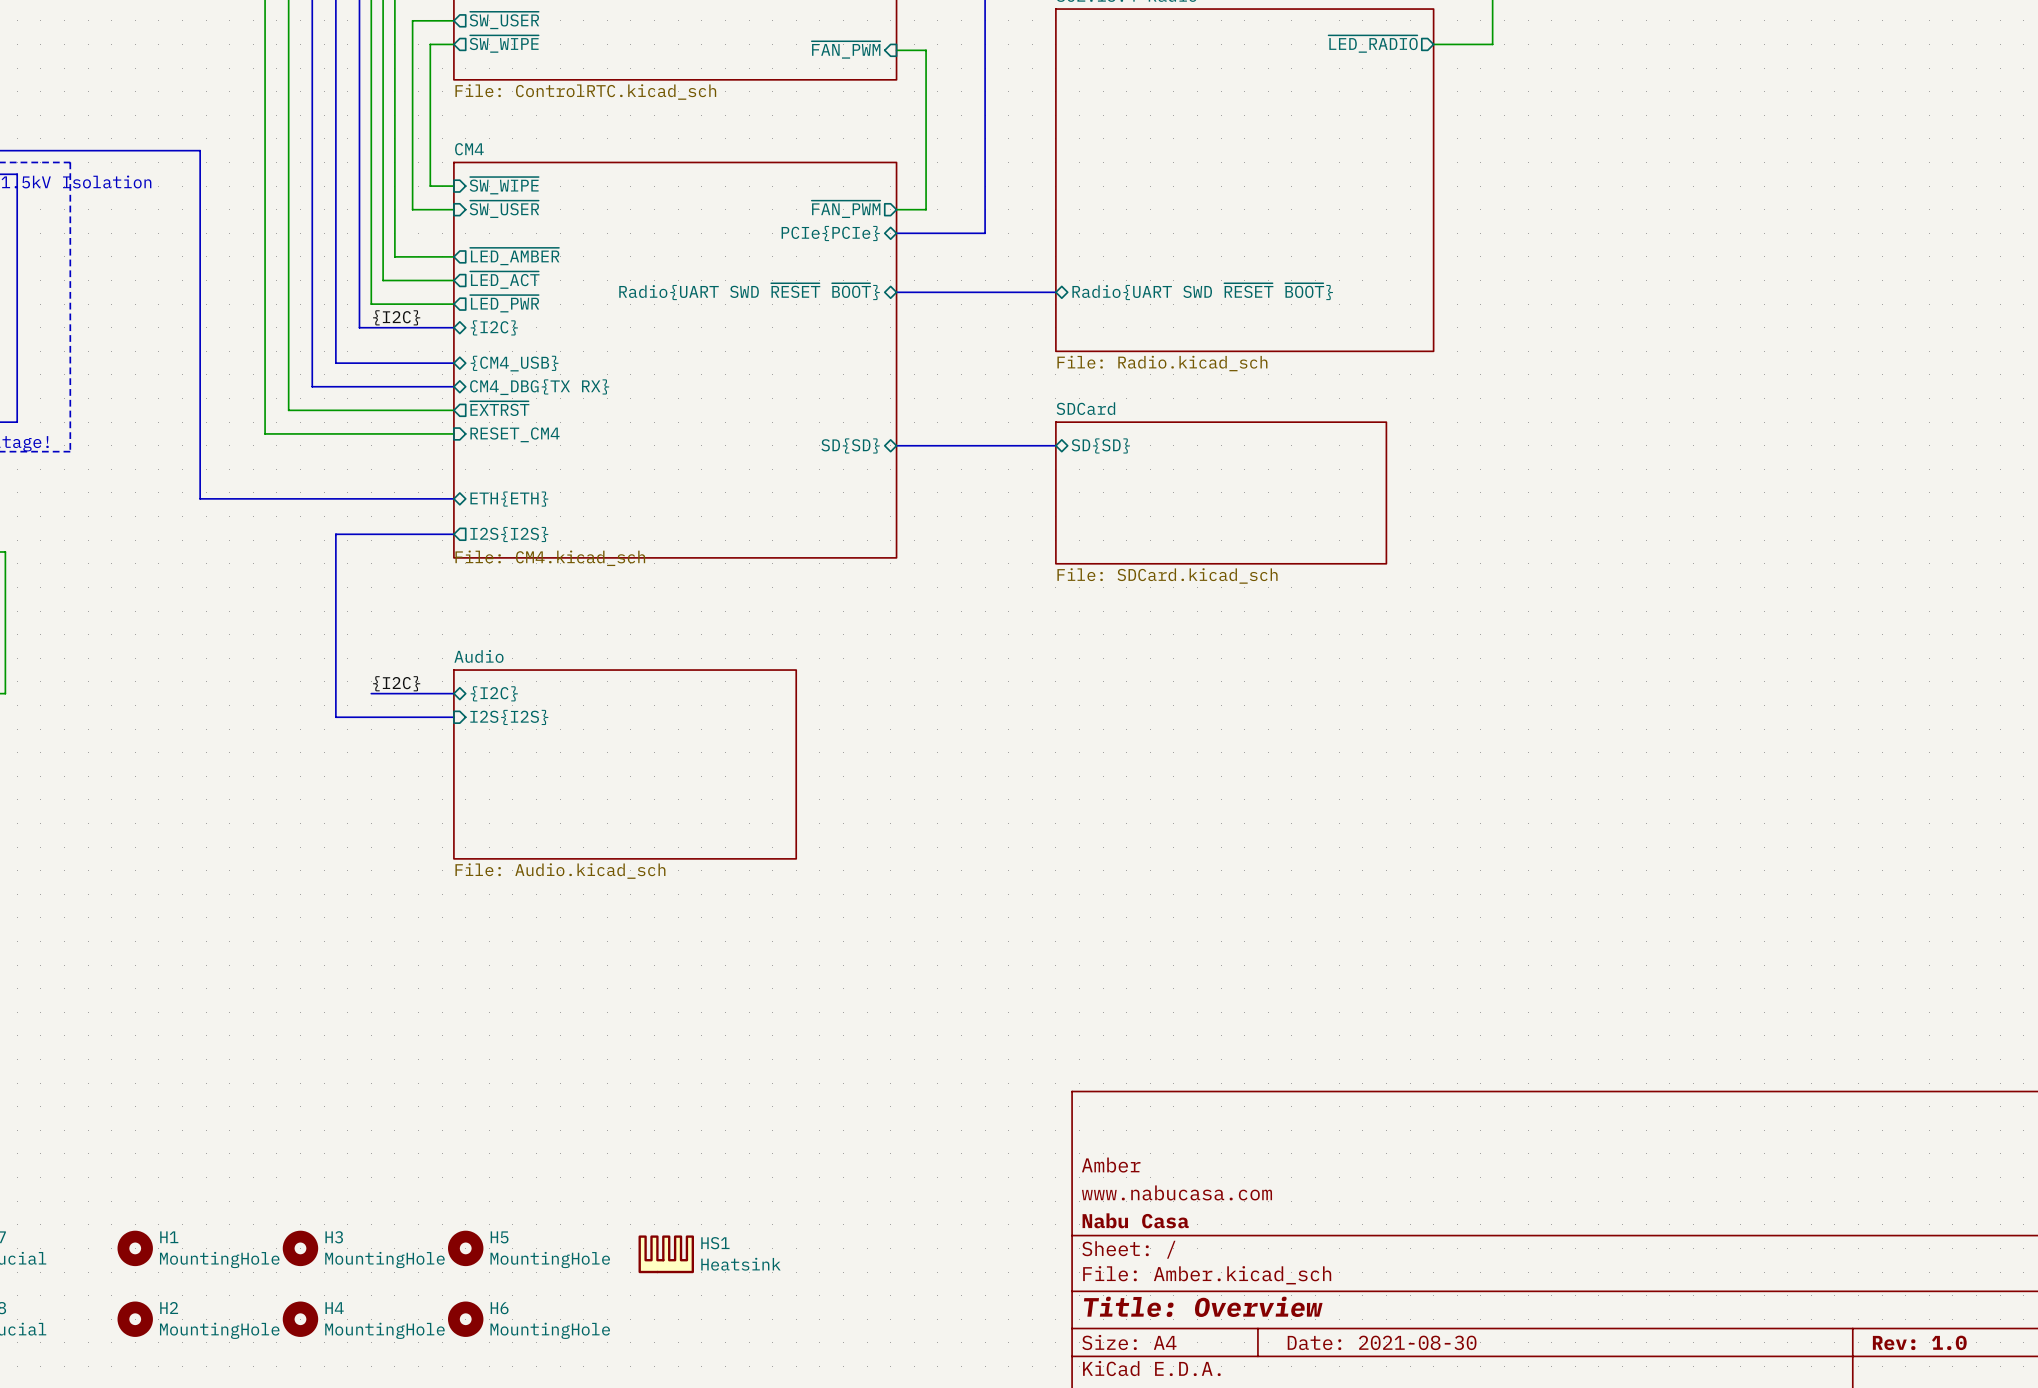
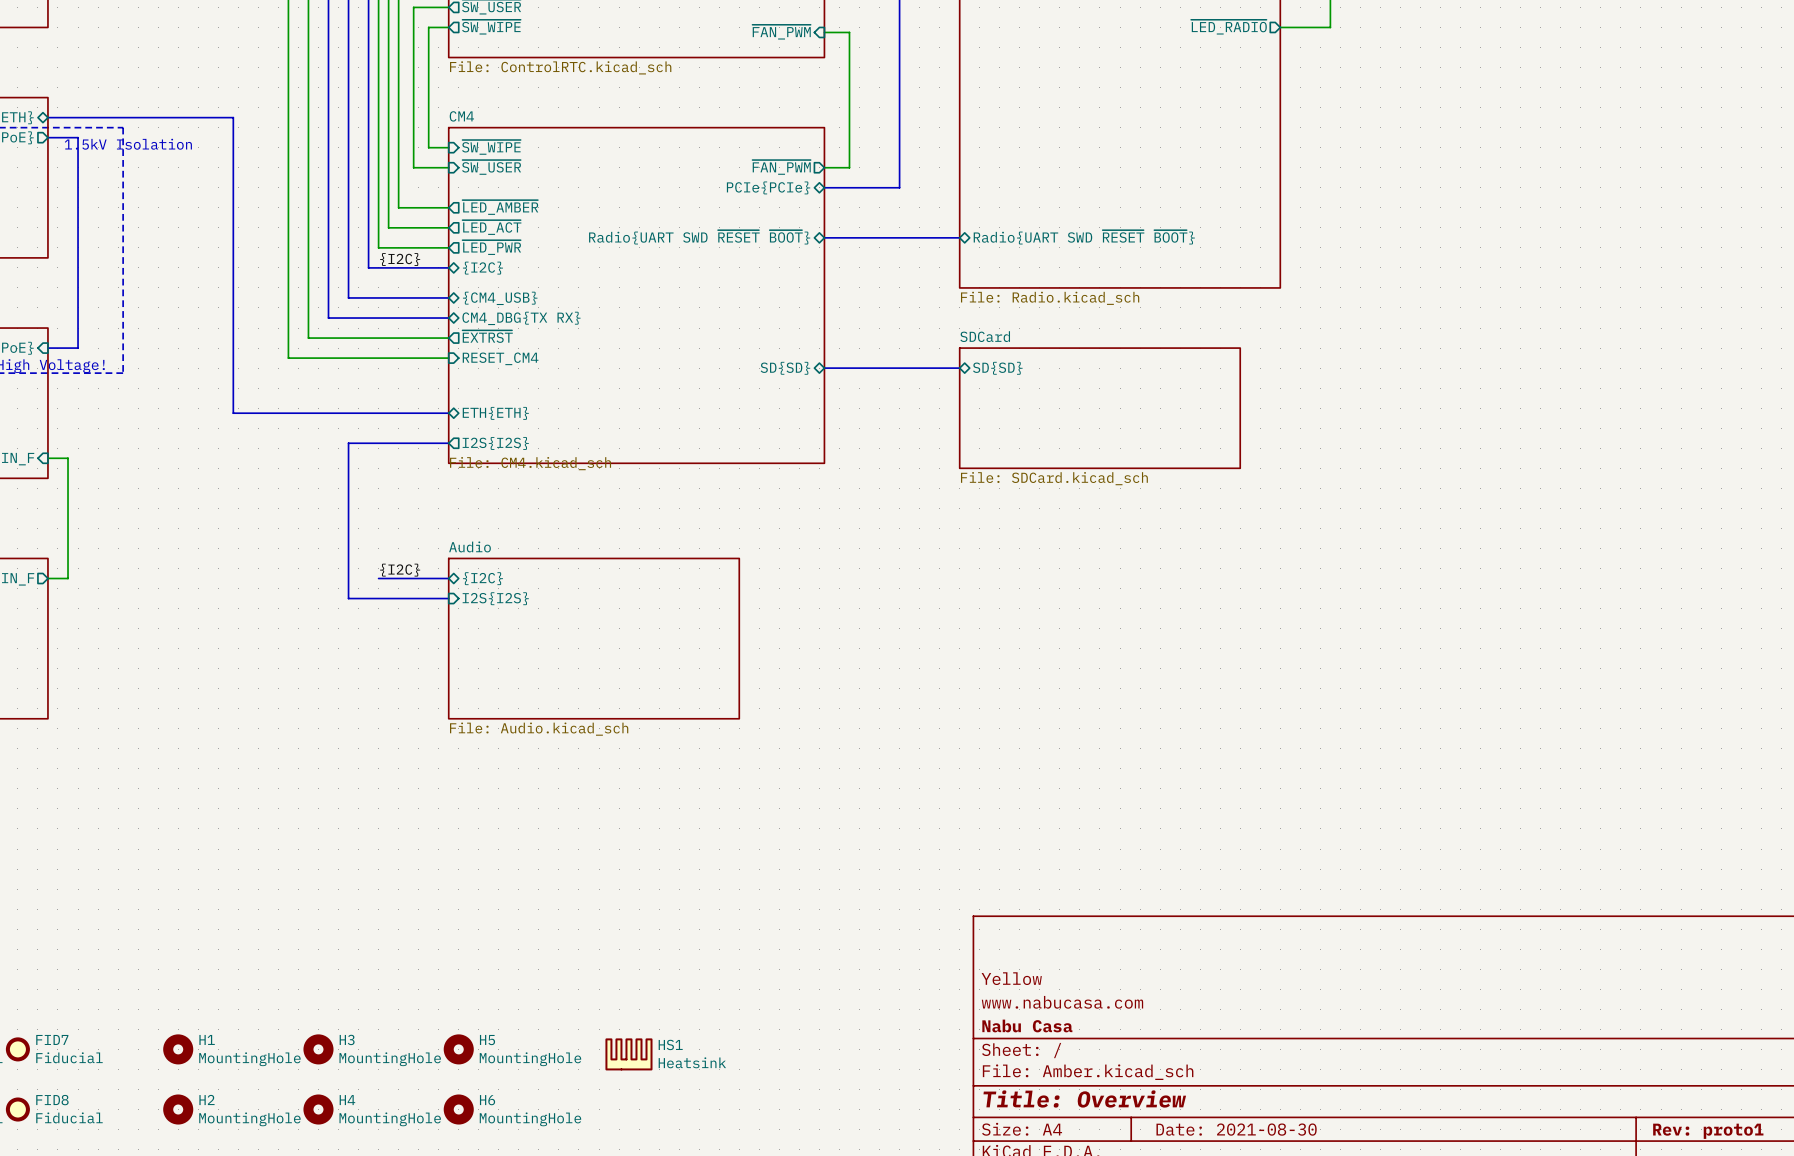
title block: Amber (1111, 1165) -> Yellow (1011, 978)
title block: Rev: 1.0 (1919, 1342) -> Rev: proto1 (1708, 1131)

